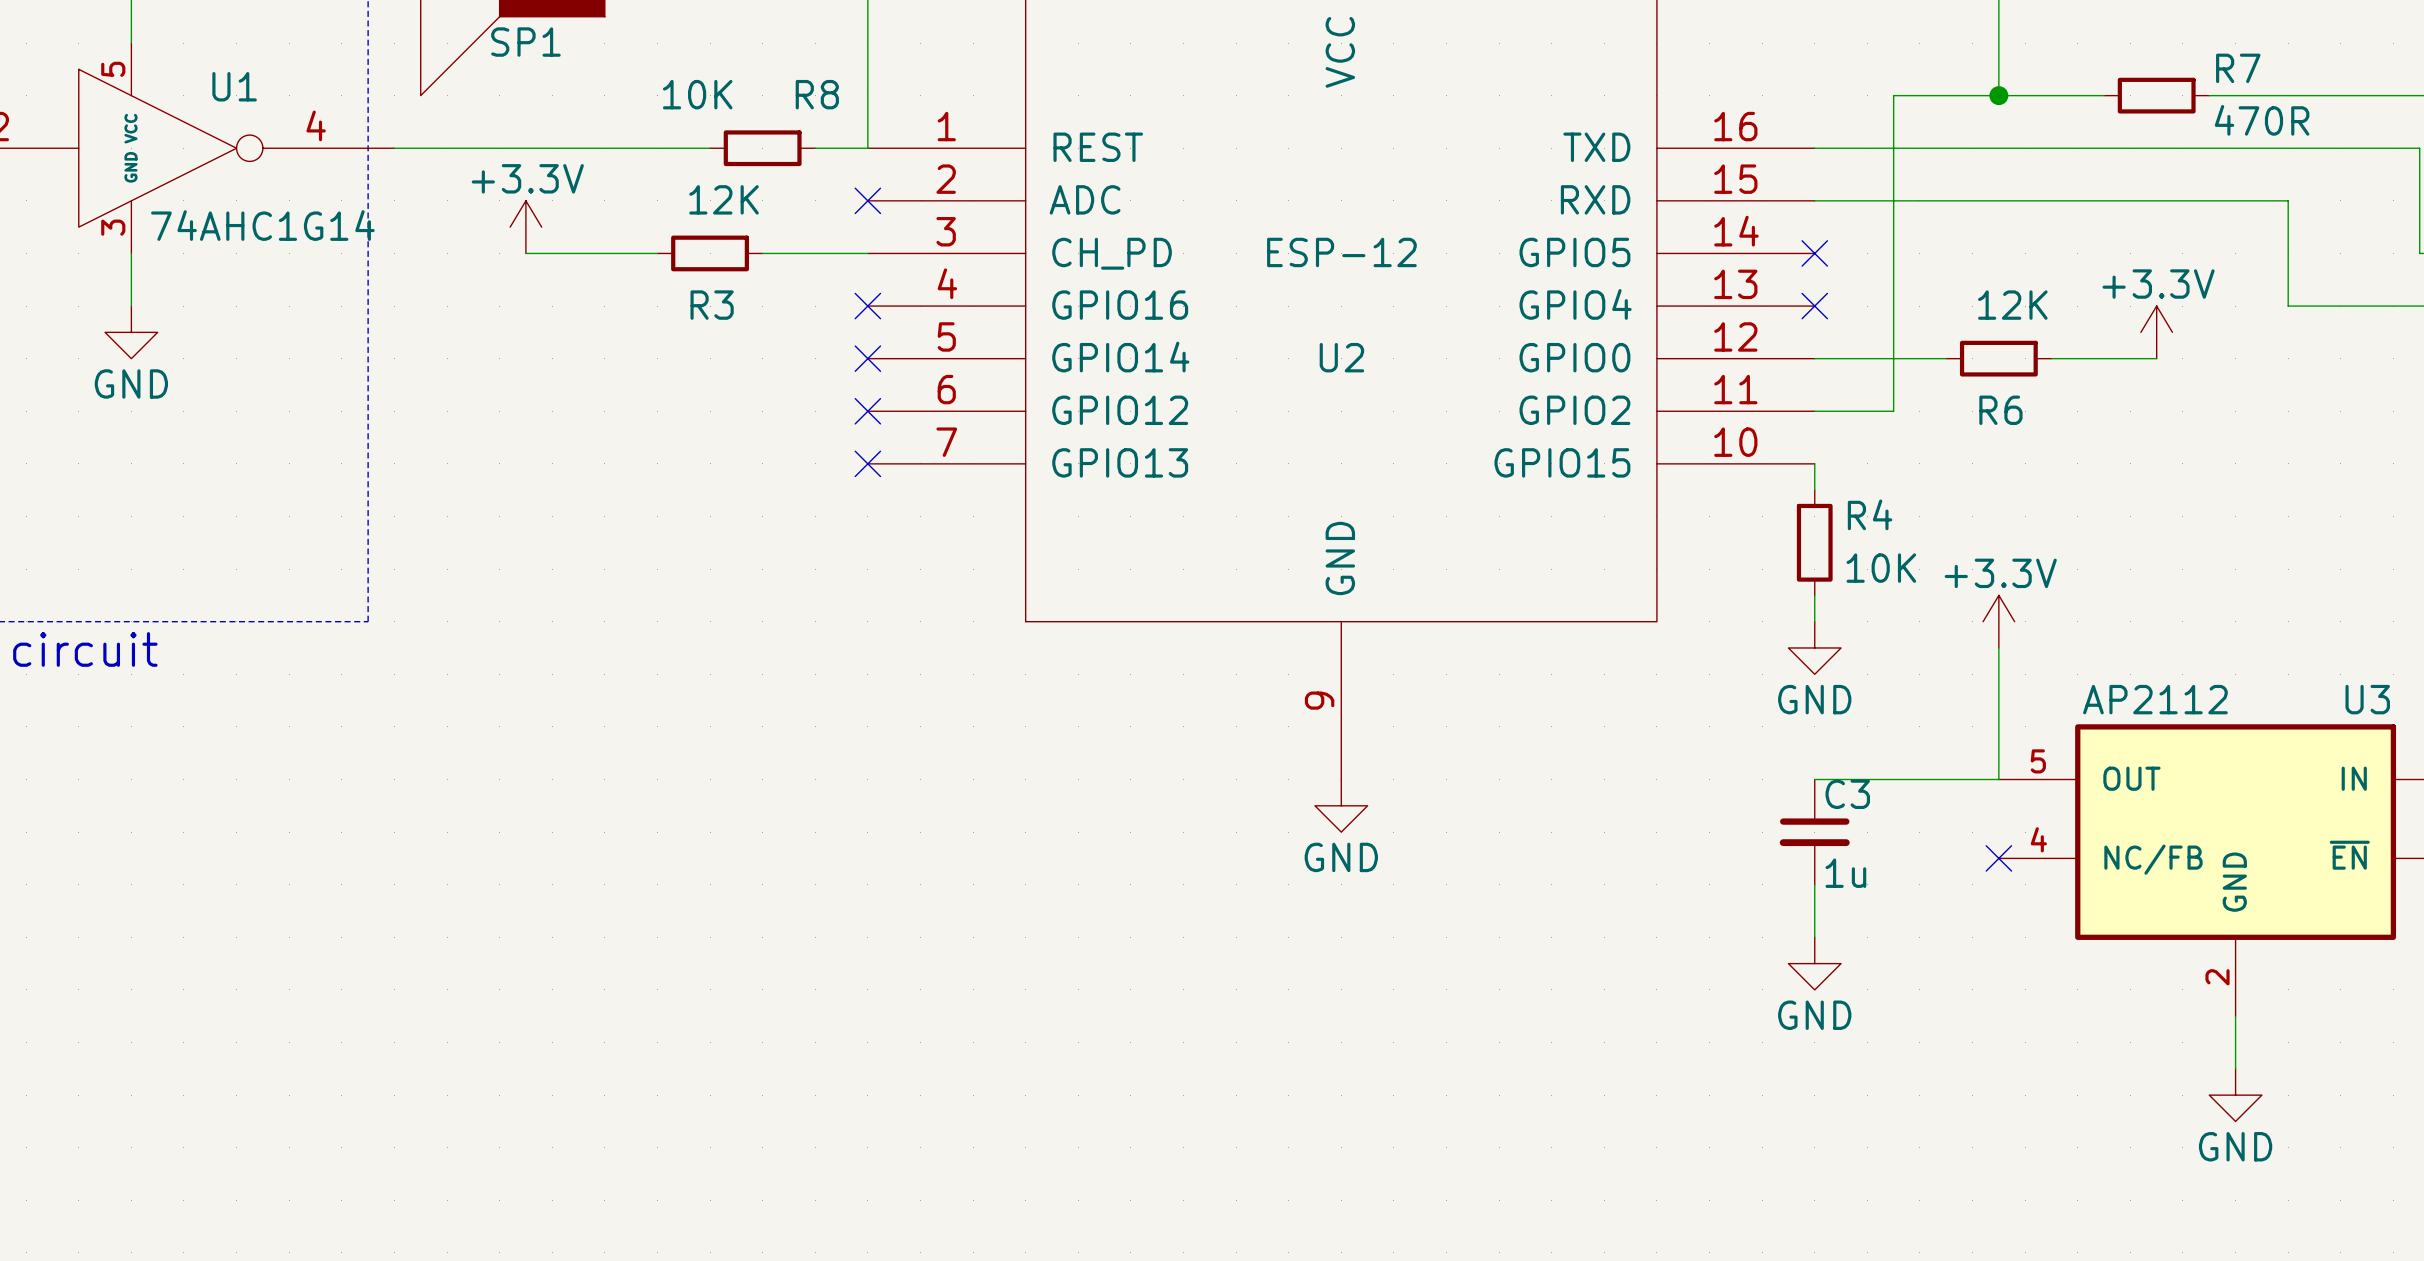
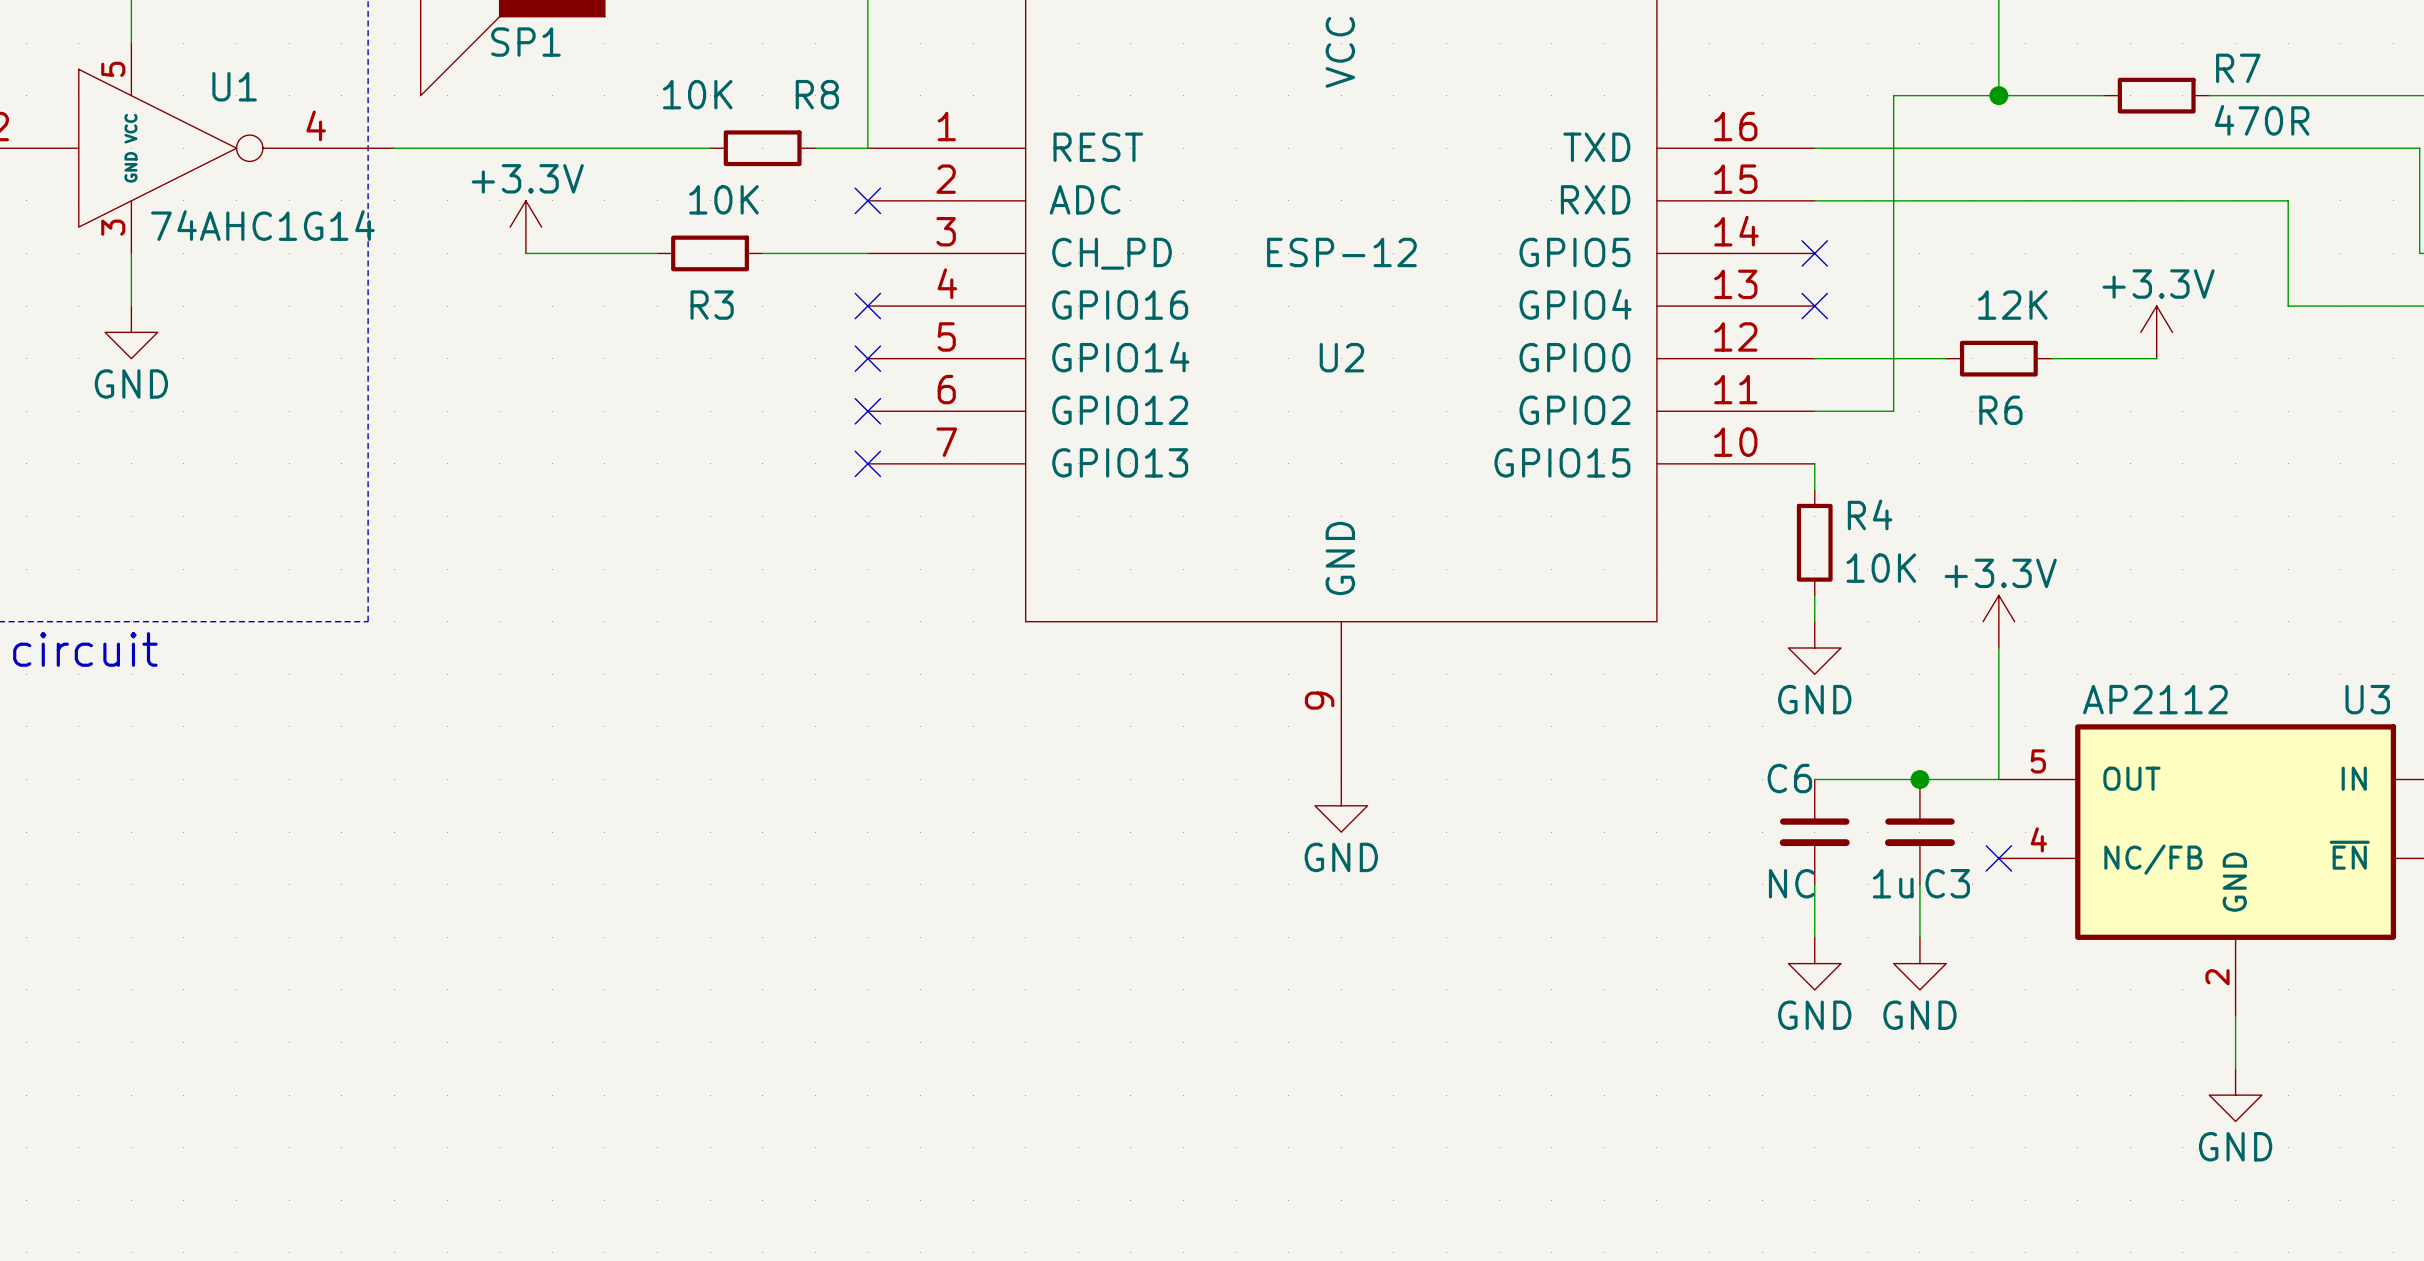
R3 value: 12K (724, 199) -> 10K (724, 199)
junction: none -> (1919, 779)
C3 name: C3 (1847, 794) -> C6 (1789, 778)
C3: none -> 1u (1919, 832)
C3 value: 1u (1845, 873) -> NC (1791, 883)
wire: none -> (1919, 884) (1919, 937)
power symbol: none -> GND (1919, 963)

